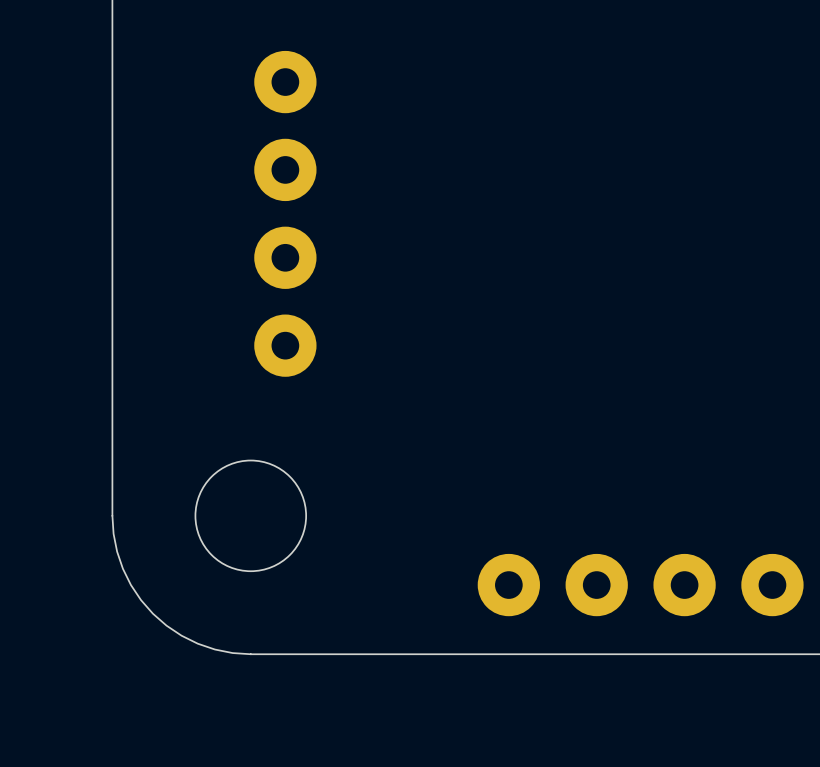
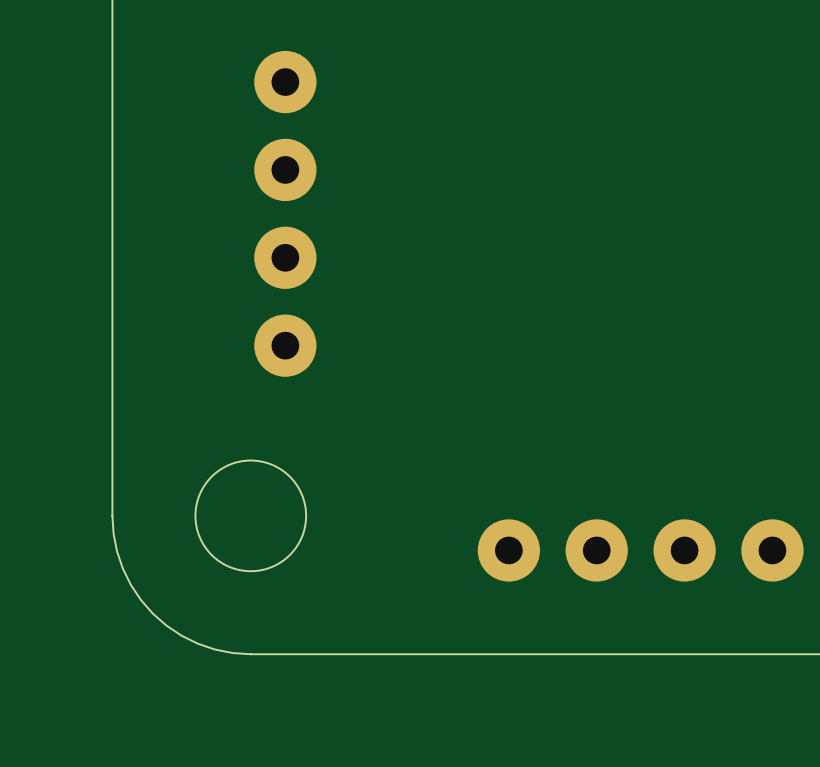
part position: (640, 585) -> (640, 550)

